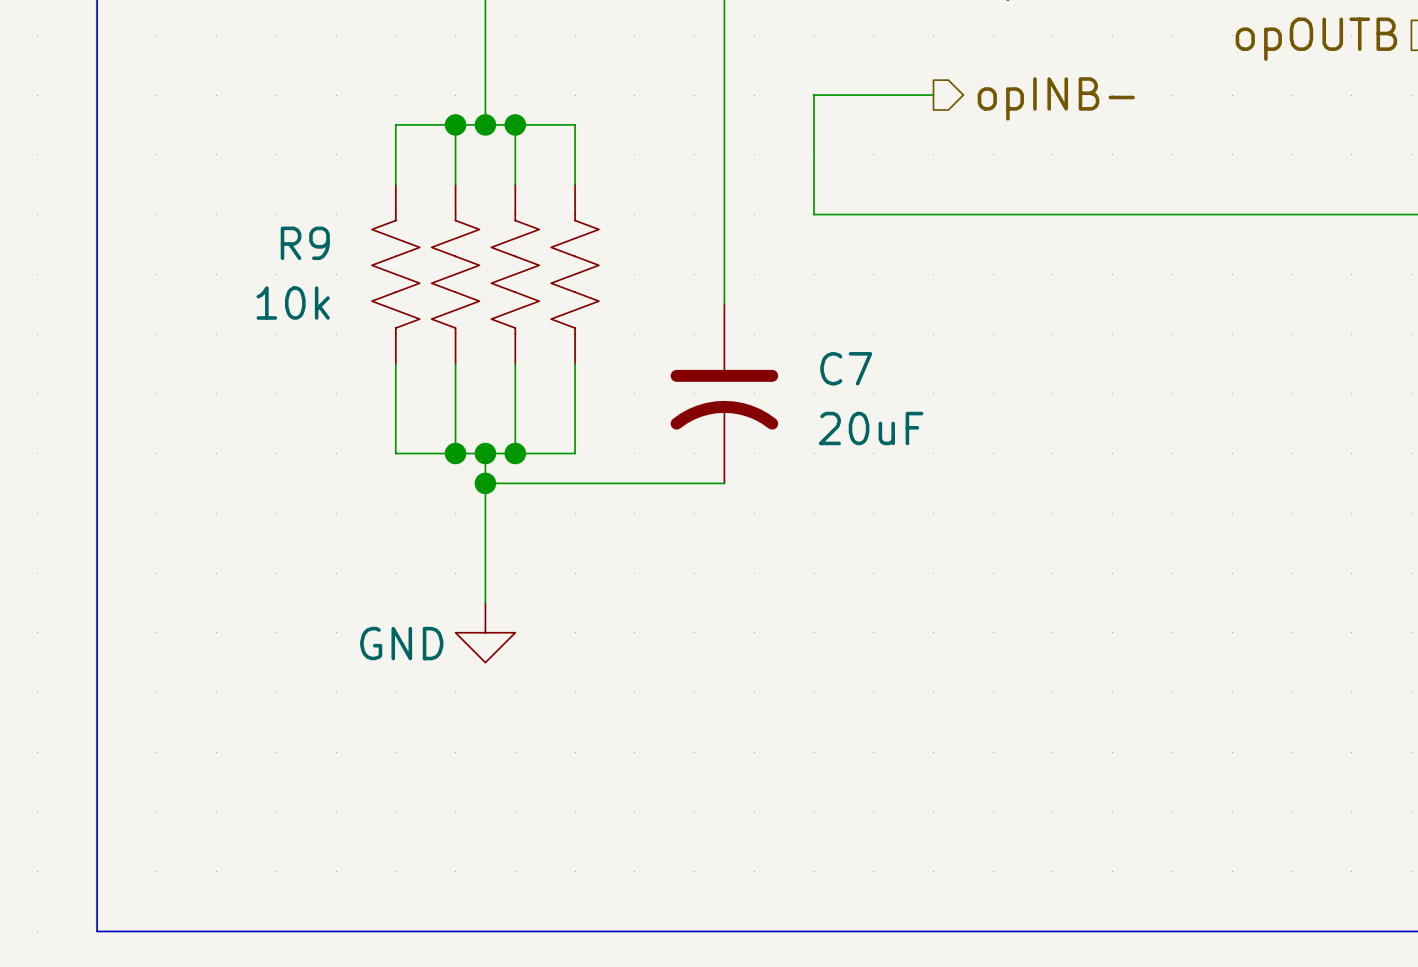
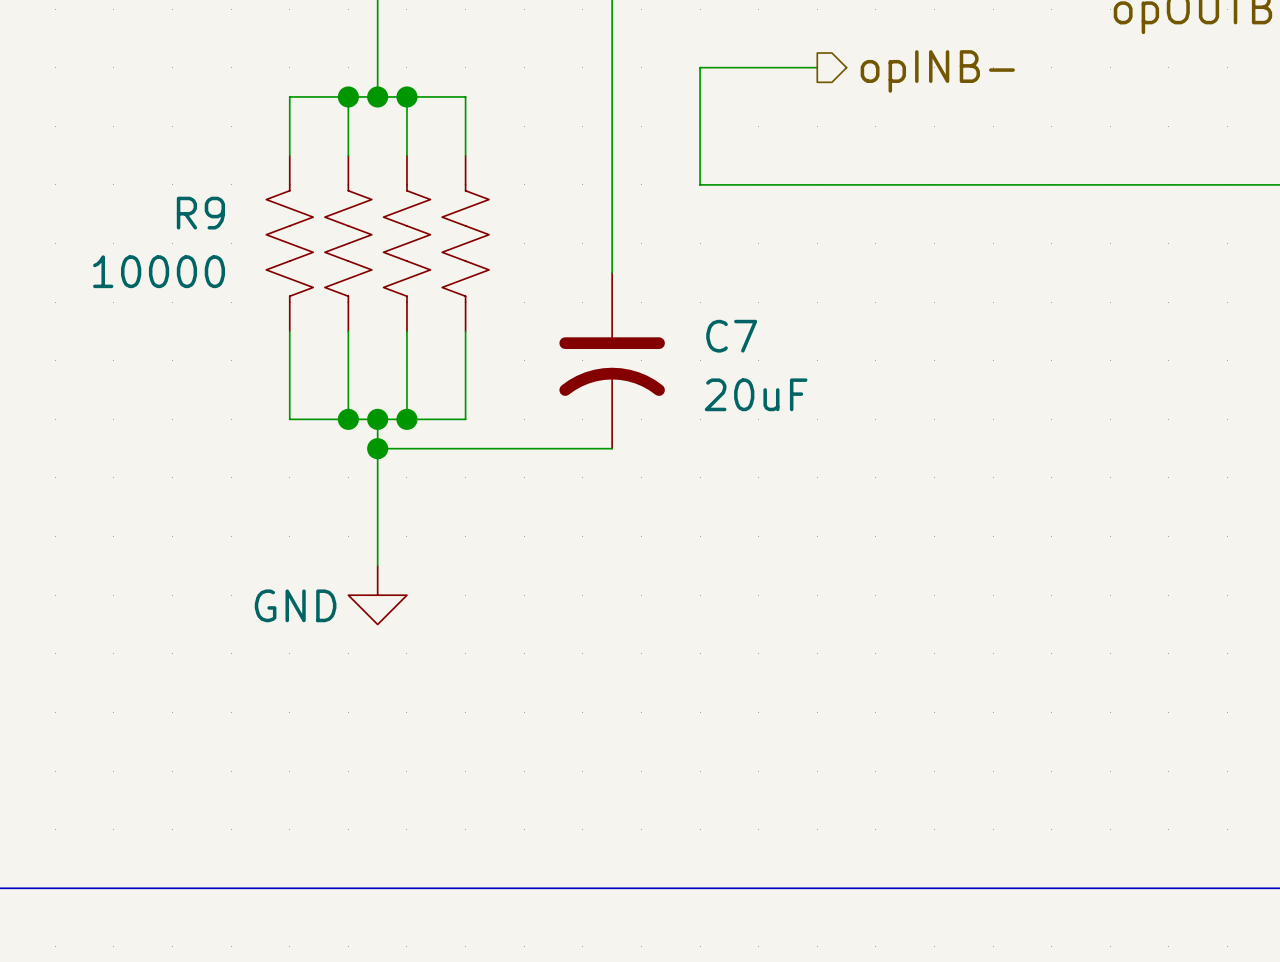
R9 value: 10k (293, 303) -> 10000 (159, 271)

